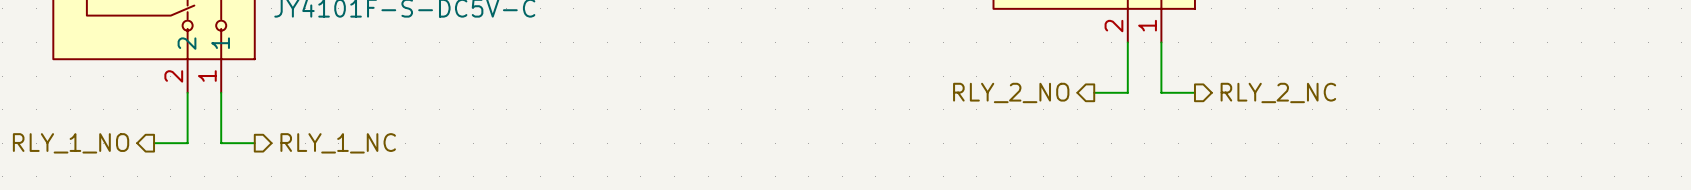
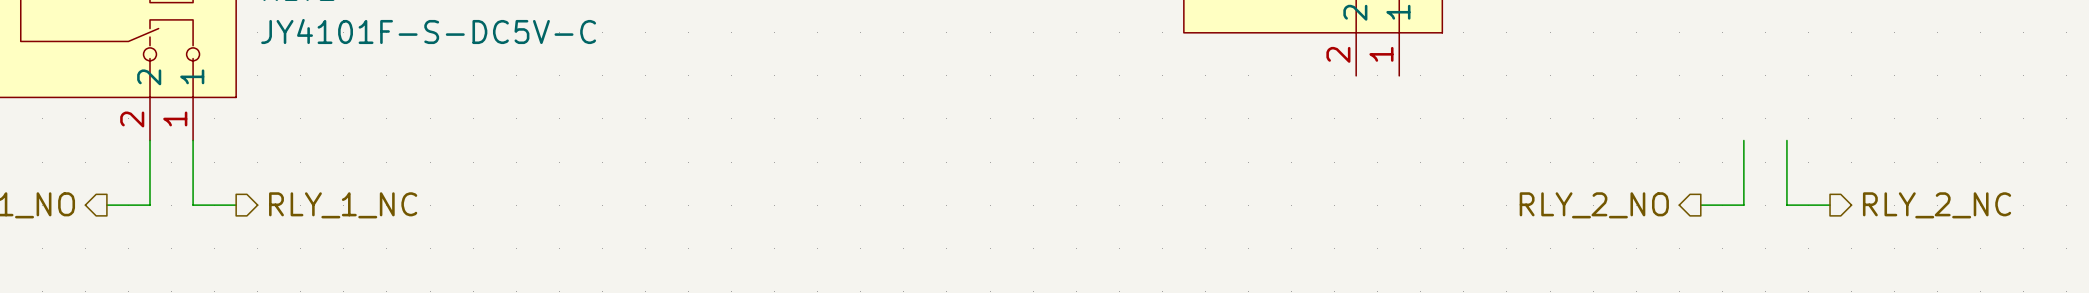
wire: (1127, 42) (1127, 92) (1094, 92) -> (1743, 140) (1743, 205) (1700, 205)
wire: (1161, 42) (1161, 92) (1194, 92) -> (1786, 140) (1786, 205) (1830, 205)
hierarchical label position: RLY_2_NO (1011, 92) -> RLY_2_NO (1594, 205)
hierarchical label position: RLY_2_NC (1278, 92) -> RLY_2_NC (1937, 205)

